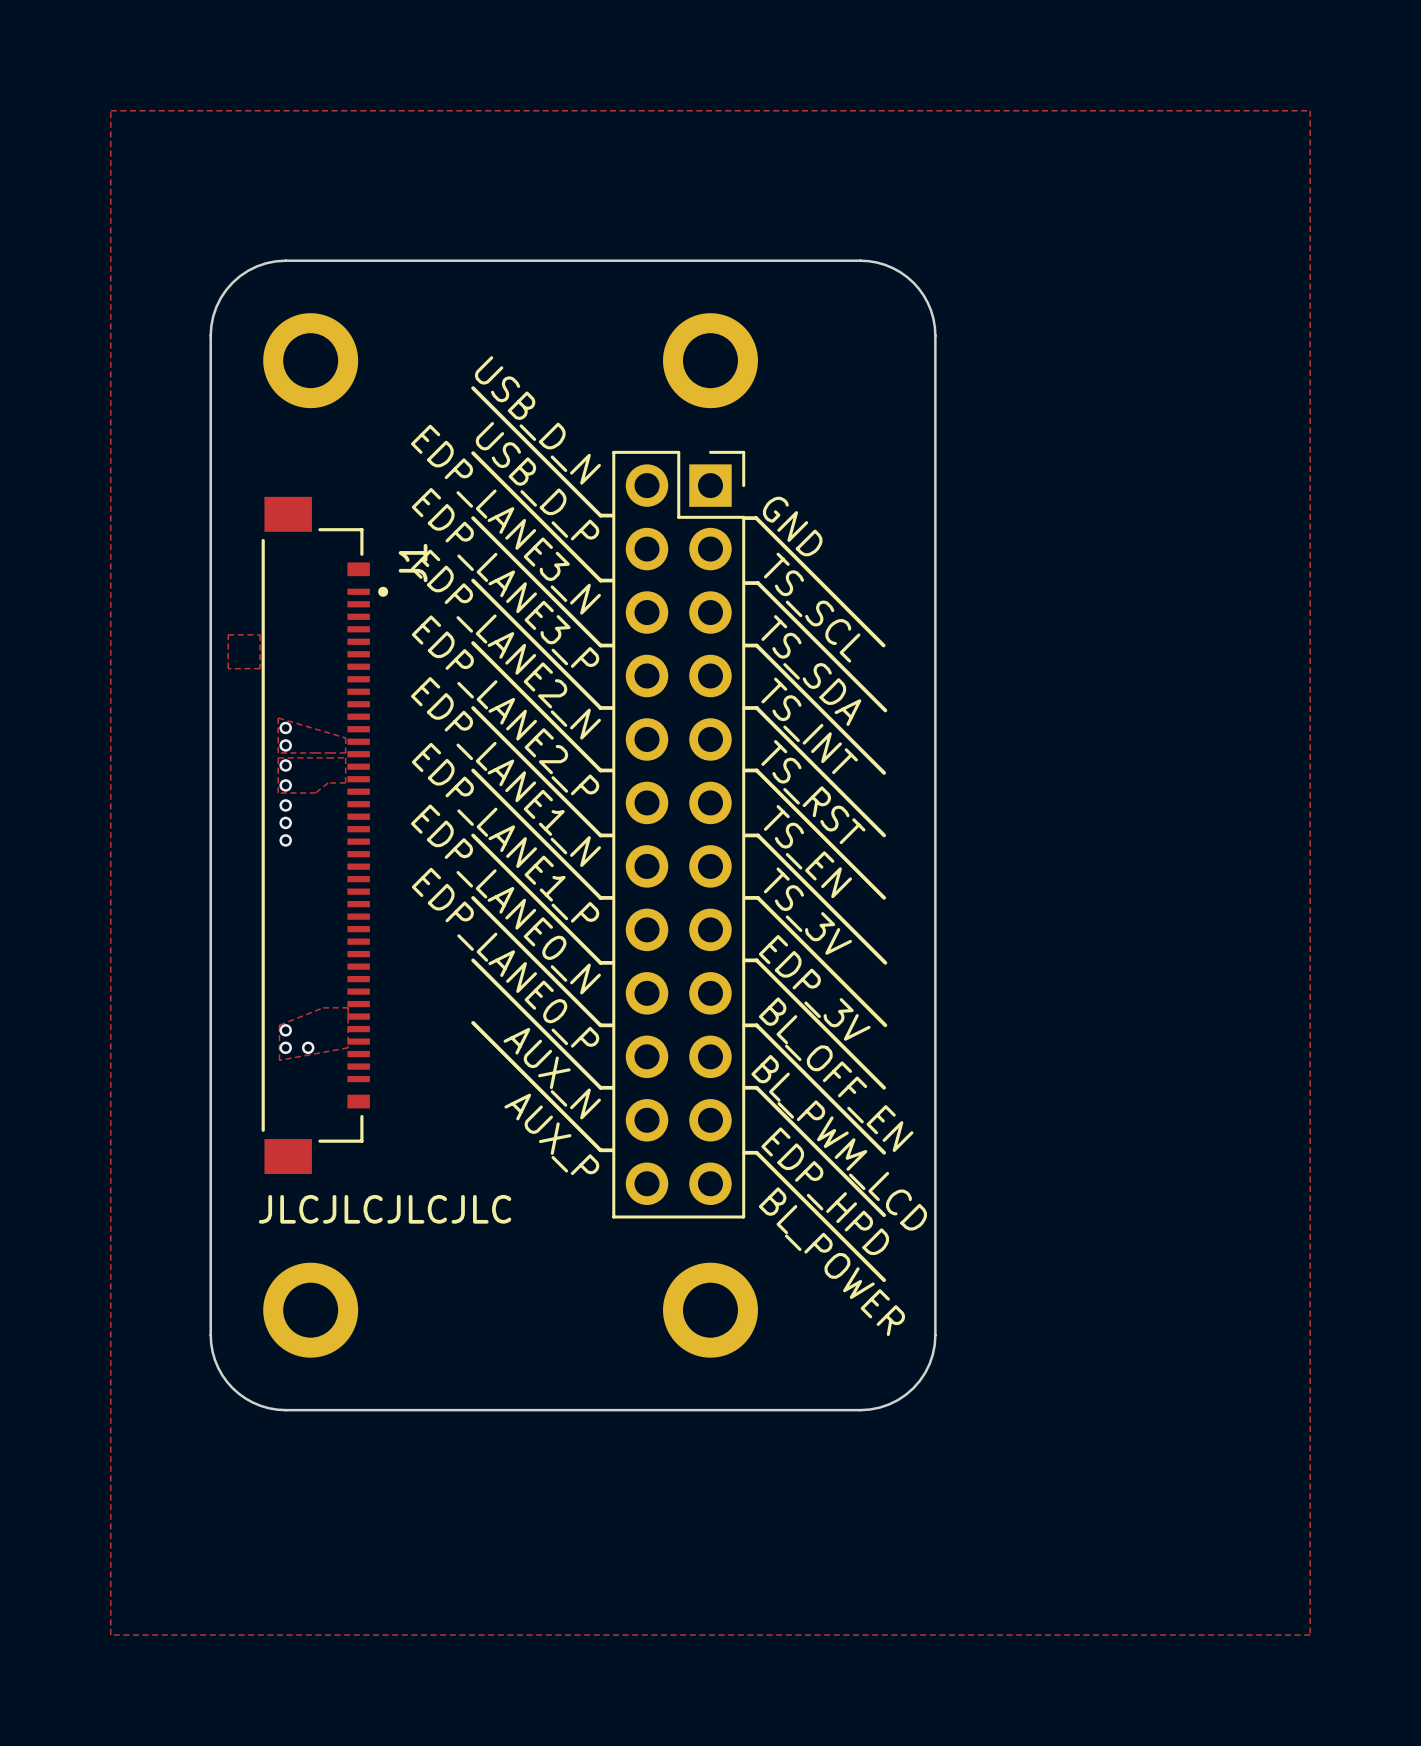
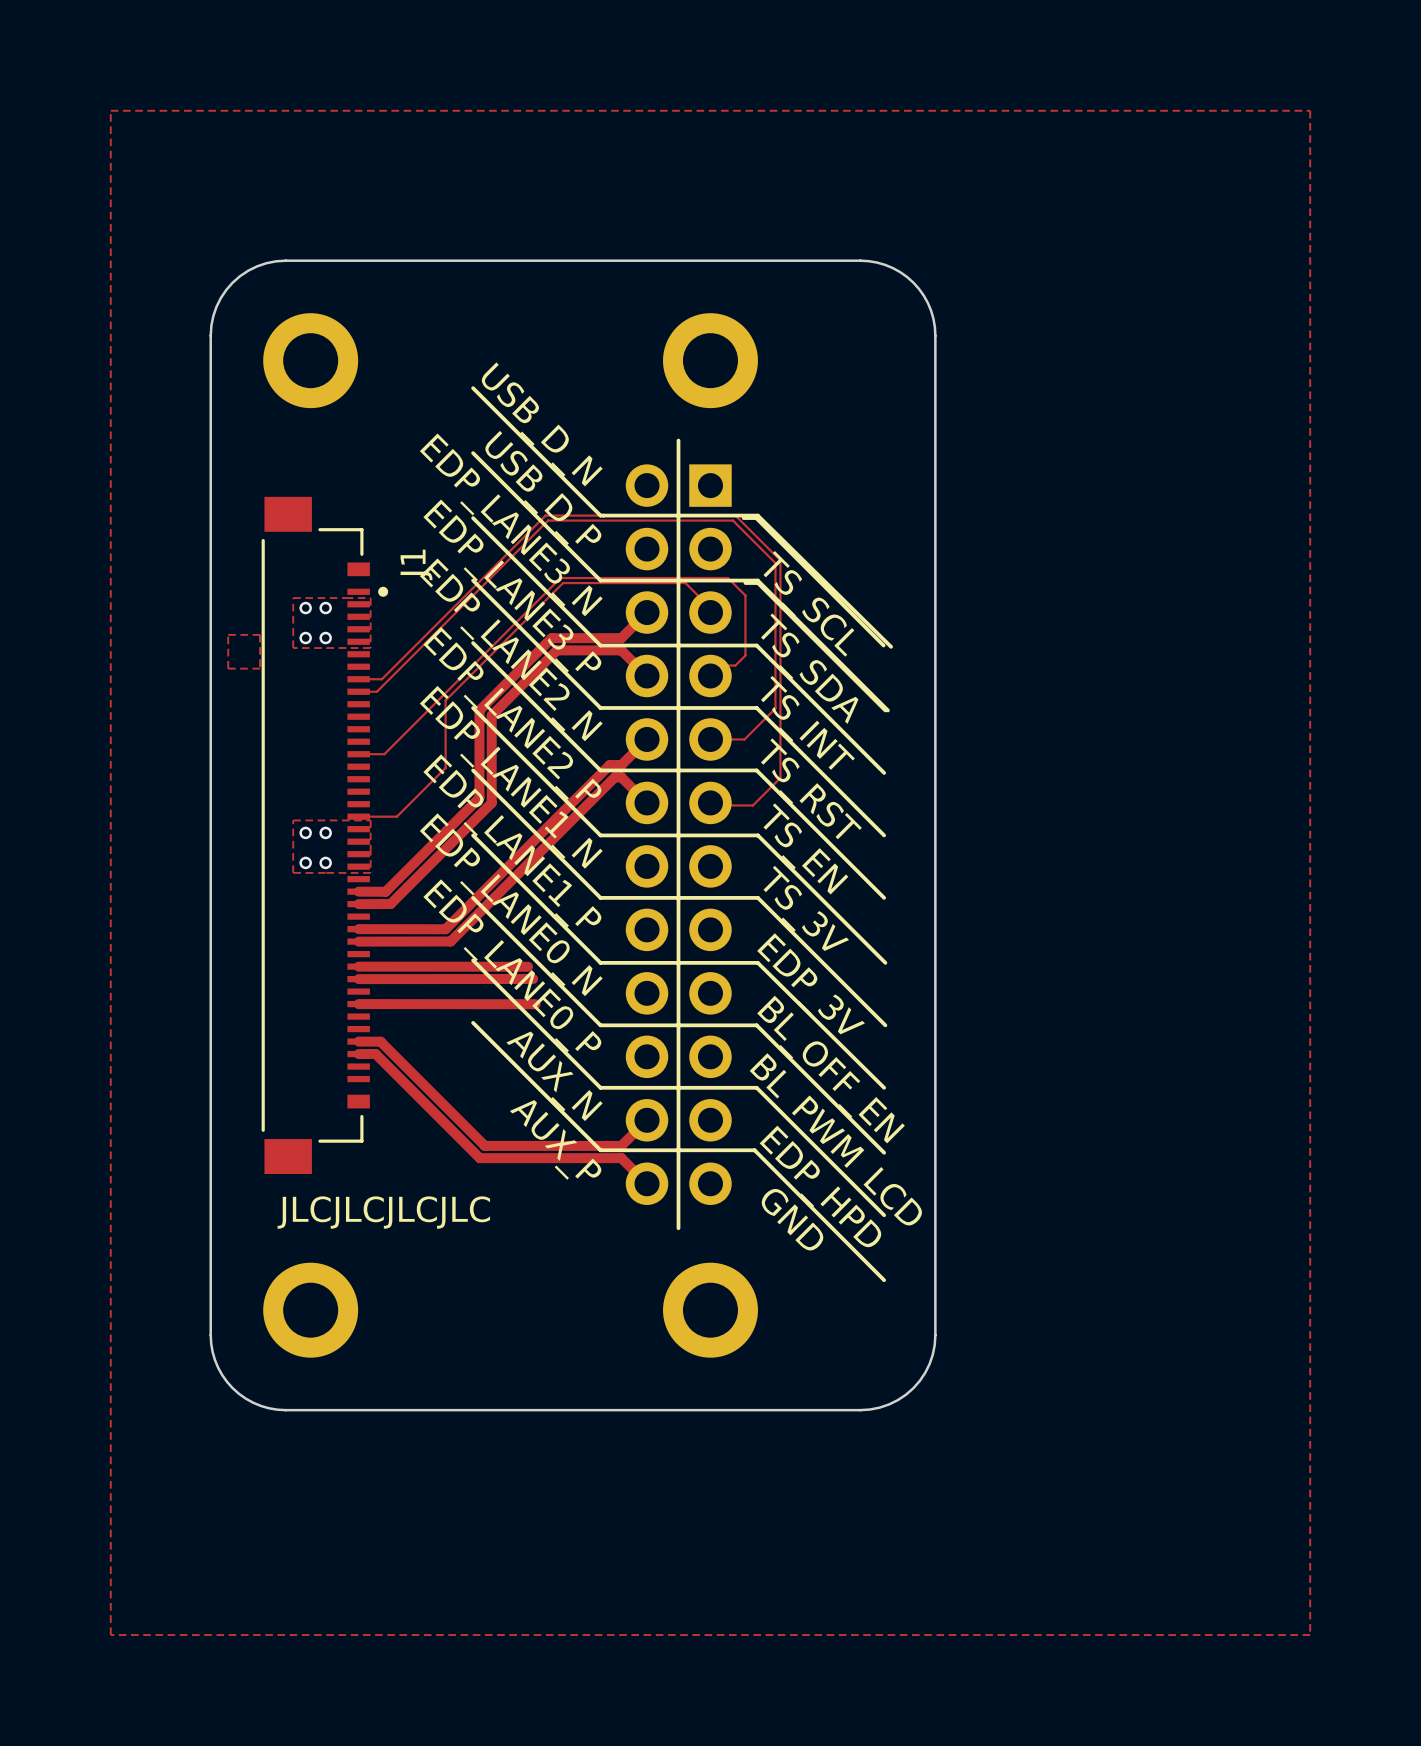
line: none -> (678, 440) (678, 1228)
part footprint: [612, 450, 746, 1219] -> [625, 464, 732, 1205]
line: none -> (613, 515) (757, 515) (891, 646)
text: GND (792, 526) -> none
line: none -> (613, 580) (757, 580) (887, 710)
zone outline: none -> (293, 598) (293, 648) (370, 648) (370, 598) (293, 598)
via: none -> (305, 608)
via: none -> (325, 608)
track: none -> (647, 612) (621, 638) (551, 638) (479, 710) (479, 797) (385, 891) (358, 891)
track: none -> (710, 612) (710, 608) (685, 583) (563, 583) (445, 700) (445, 767) (396, 816) (358, 816)
via: none -> (305, 638)
via: none -> (325, 638)
line: none -> (613, 645) (744, 645)
track: none -> (647, 676) (621, 650) (556, 650) (491, 715) (491, 802) (390, 904) (358, 904)
track: none -> (710, 676) (720, 665) (735, 665) (745, 655) (745, 595) (727, 578) (560, 578) (384, 754) (358, 754)
track: none -> (358, 679) (381, 679) (545, 515) (735, 515) (780, 560) (780, 777) (752, 805) (712, 805) (710, 802)
track: none -> (358, 691) (376, 691) (548, 520) (732, 520) (775, 563) (775, 708) (744, 739) (710, 739)
line: none -> (613, 707) (744, 707)
zone outline: (278, 717) (278, 752) (345, 752) (345, 737) (278, 717) -> none
via: (285, 727) -> none
track: none -> (647, 739) (621, 765) (609, 765) (445, 929) (358, 929)
via: (285, 745) -> none
zone outline: (278, 757) (278, 792) (315, 792) (328, 782) (345, 782) (345, 757) (278, 757) -> none
via: (285, 765) -> none
line: none -> (613, 770) (744, 770)
via: (285, 785) -> none
track: none -> (647, 802) (621, 777) (614, 777) (450, 941) (358, 941)
via: (285, 805) -> none
zone outline: none -> (293, 820) (293, 872) (370, 872) (370, 820) (293, 820)
via: (285, 822) -> none
via: none -> (305, 832)
via: none -> (325, 832)
line: none -> (613, 835) (745, 835)
via: (285, 840) -> none
via: none -> (305, 862)
via: none -> (325, 862)
line: none -> (613, 897) (745, 897)
line: (744, 960) (756, 960) (884, 1087) -> (613, 962) (757, 962) (884, 1087)
track: none -> (358, 966) (528, 966)
track: none -> (358, 979) (533, 978)
track: none -> (358, 1004) (535, 1004)
zone outline: (323, 1007) (279, 1025) (279, 1060) (348, 1047) (348, 1007) (323, 1007) -> none
line: none -> (613, 1025) (744, 1025)
via: (285, 1030) -> none
track: none -> (358, 1041) (380, 1041) (484, 1145) (621, 1145) (647, 1120)
via: (285, 1047) -> none
via: (308, 1047) -> none
track: none -> (358, 1054) (375, 1053) (479, 1158) (621, 1158) (647, 1183)
line: none -> (613, 1087) (744, 1087)
line: (744, 1152) (756, 1152) (884, 1280) -> (613, 1150) (754, 1150) (884, 1280)
text: BL_POWER (831, 1261) -> GND (792, 1219)

